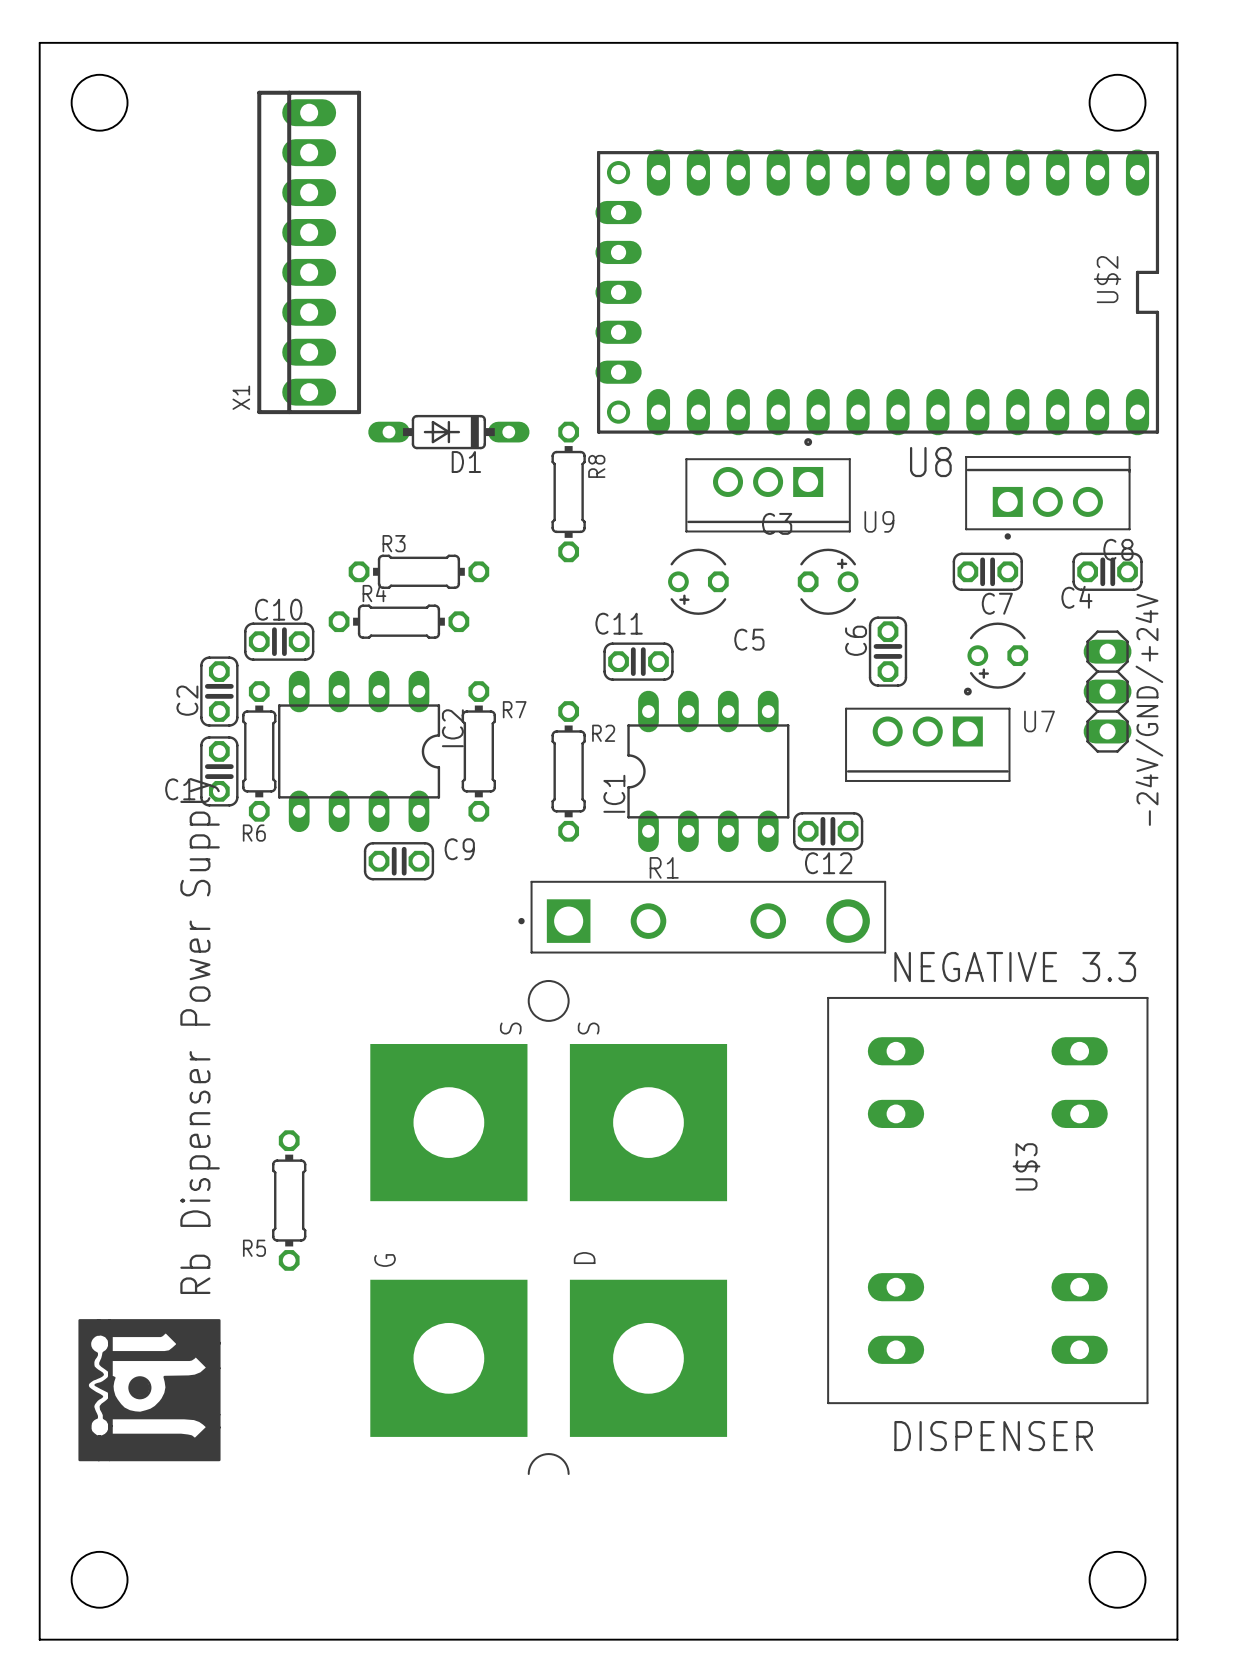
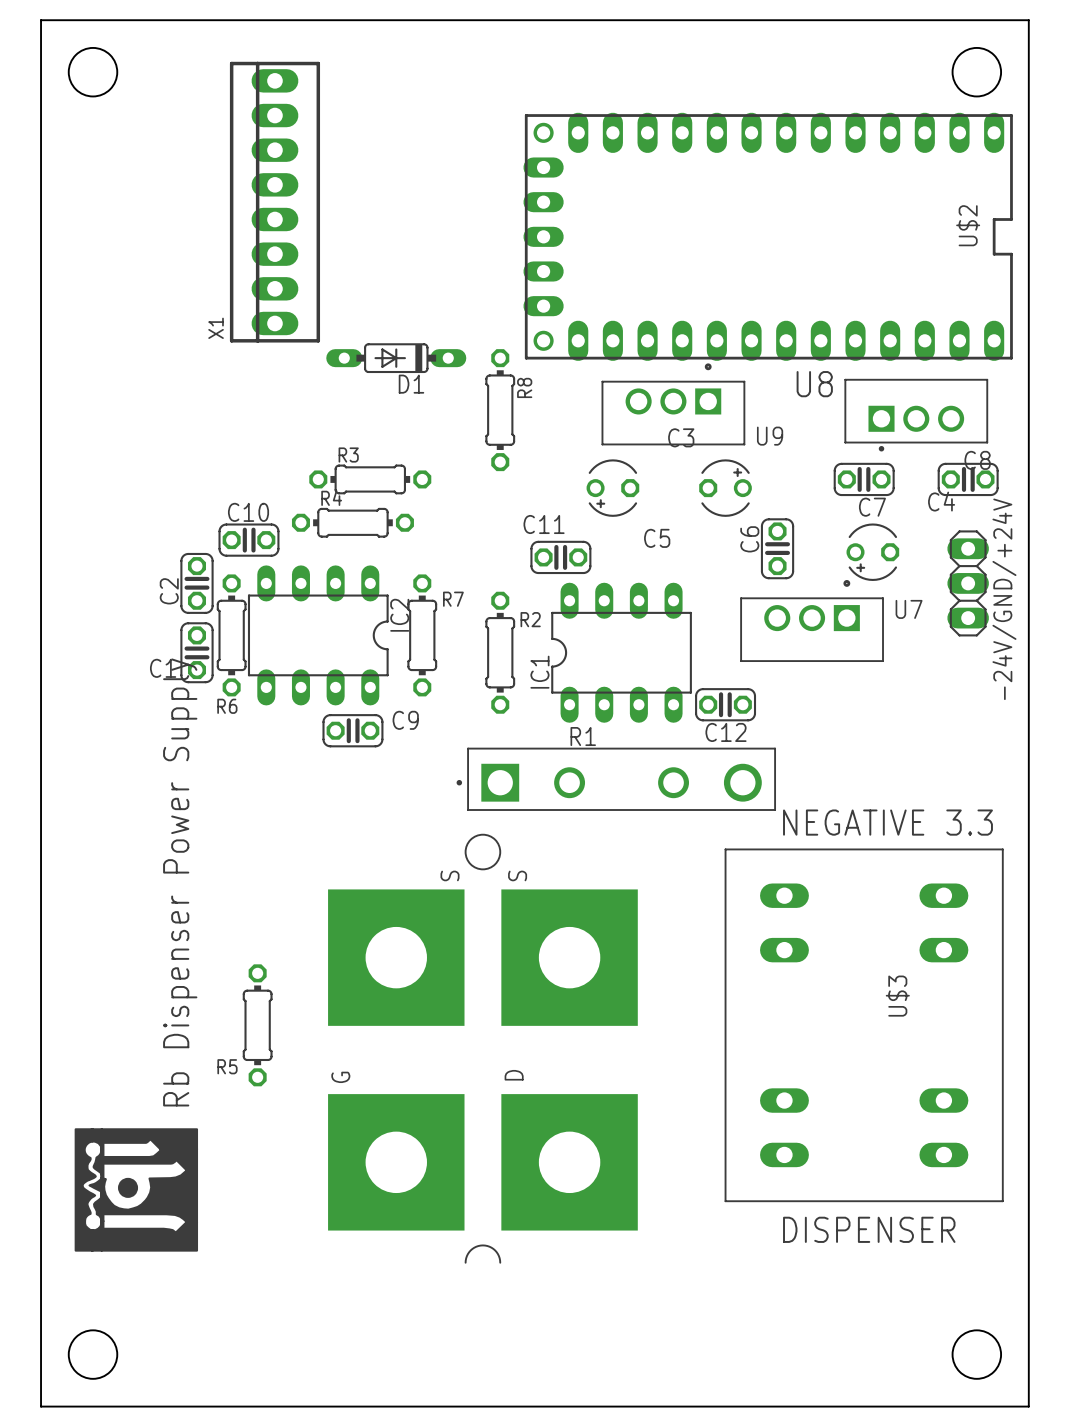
U9 footprint: [685, 438, 851, 533] -> [601, 363, 746, 446]
U8 footprint: [965, 455, 1131, 540] -> [844, 378, 989, 452]
U7 footprint: [845, 687, 1011, 782] -> [740, 580, 884, 662]

